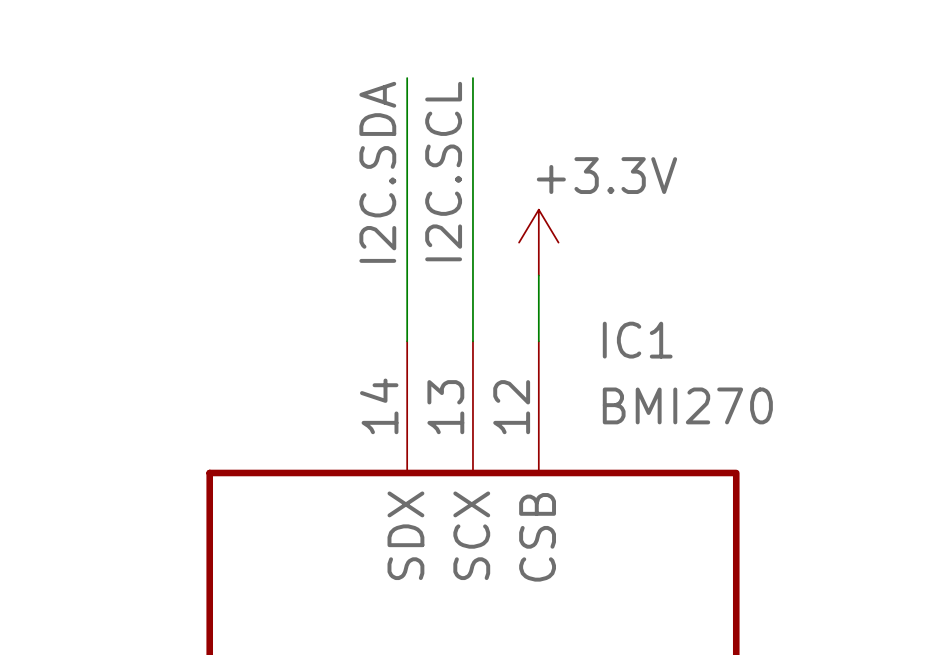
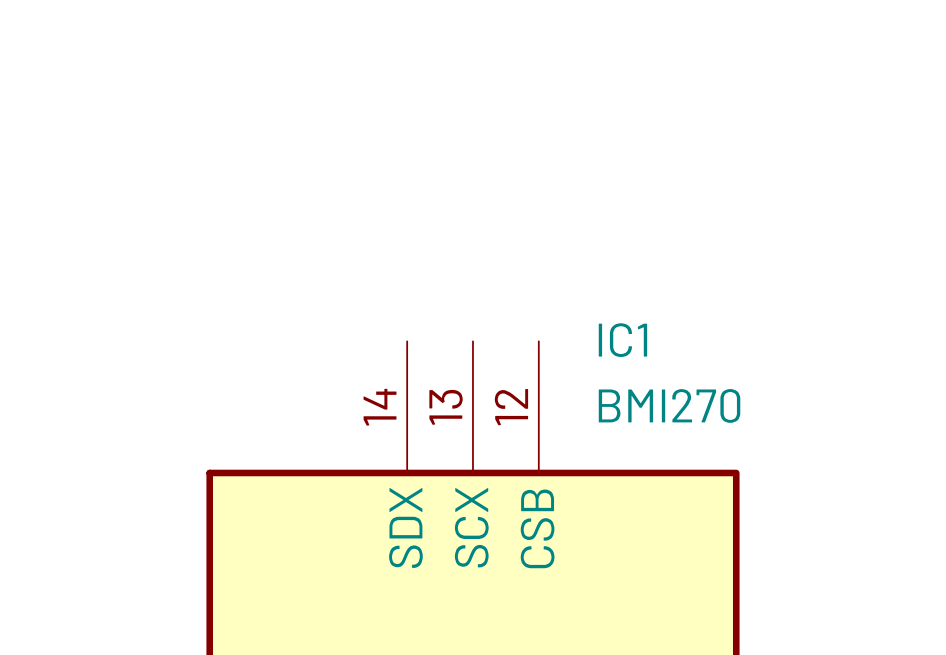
wire: (407, 78) (407, 341) -> none
wire: (472, 78) (472, 341) -> none
label: I2C.SCL (443, 171) -> none
label: I2C.SDA (377, 172) -> none
power symbol: +3.3V (538, 242) -> none
wire: (538, 275) (538, 341) -> none

